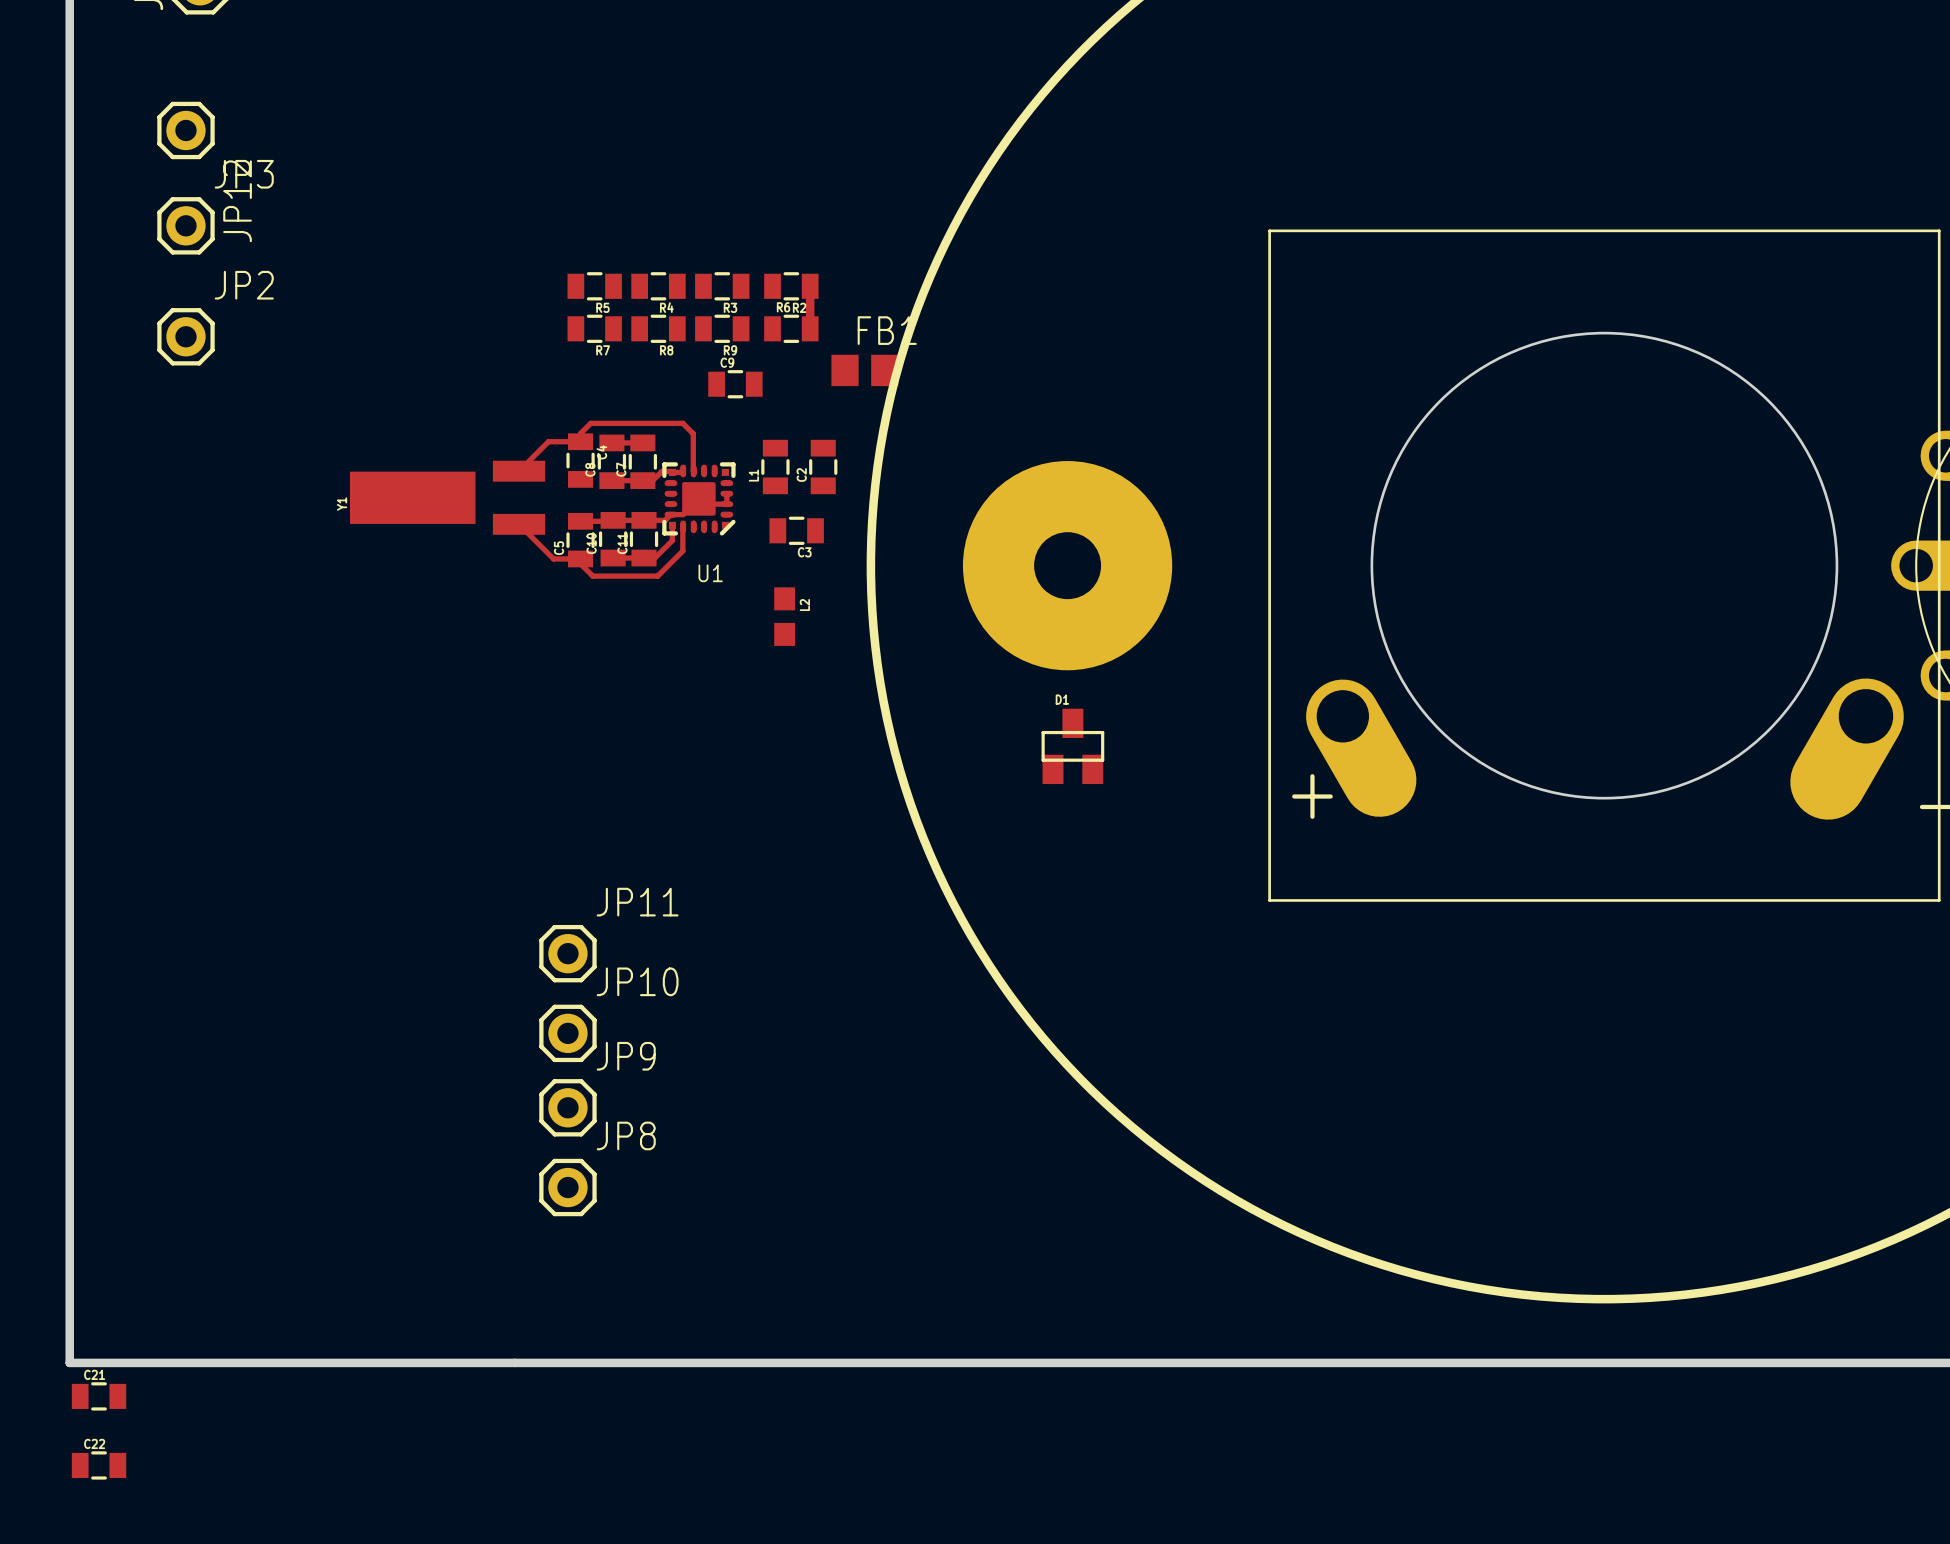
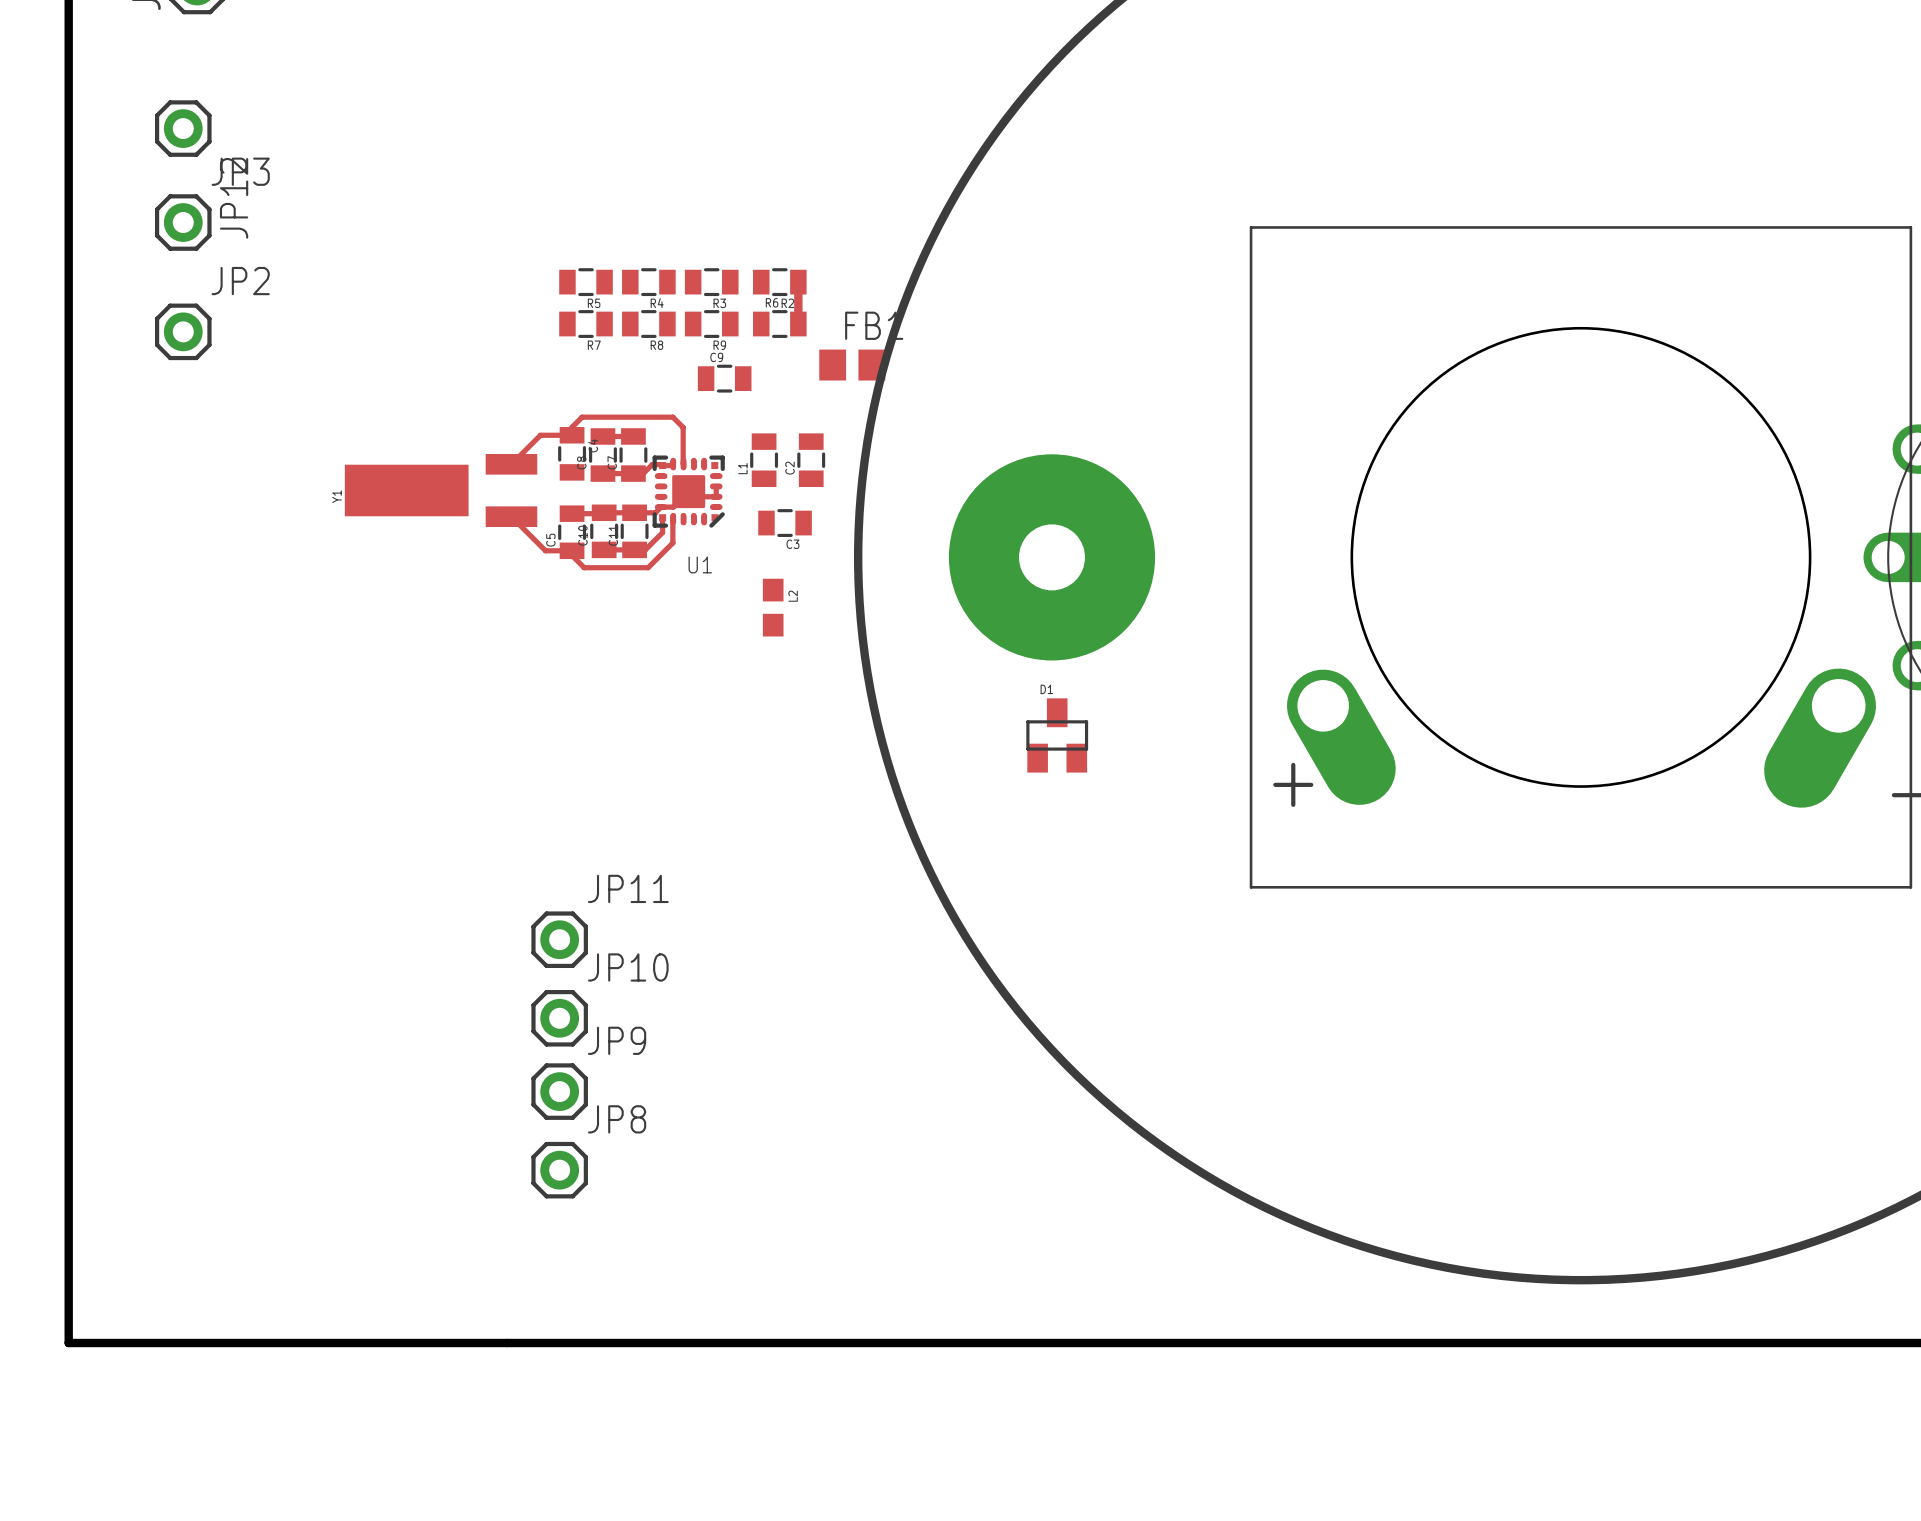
C21: (99, 1396) -> none
C22: (99, 1465) -> none

